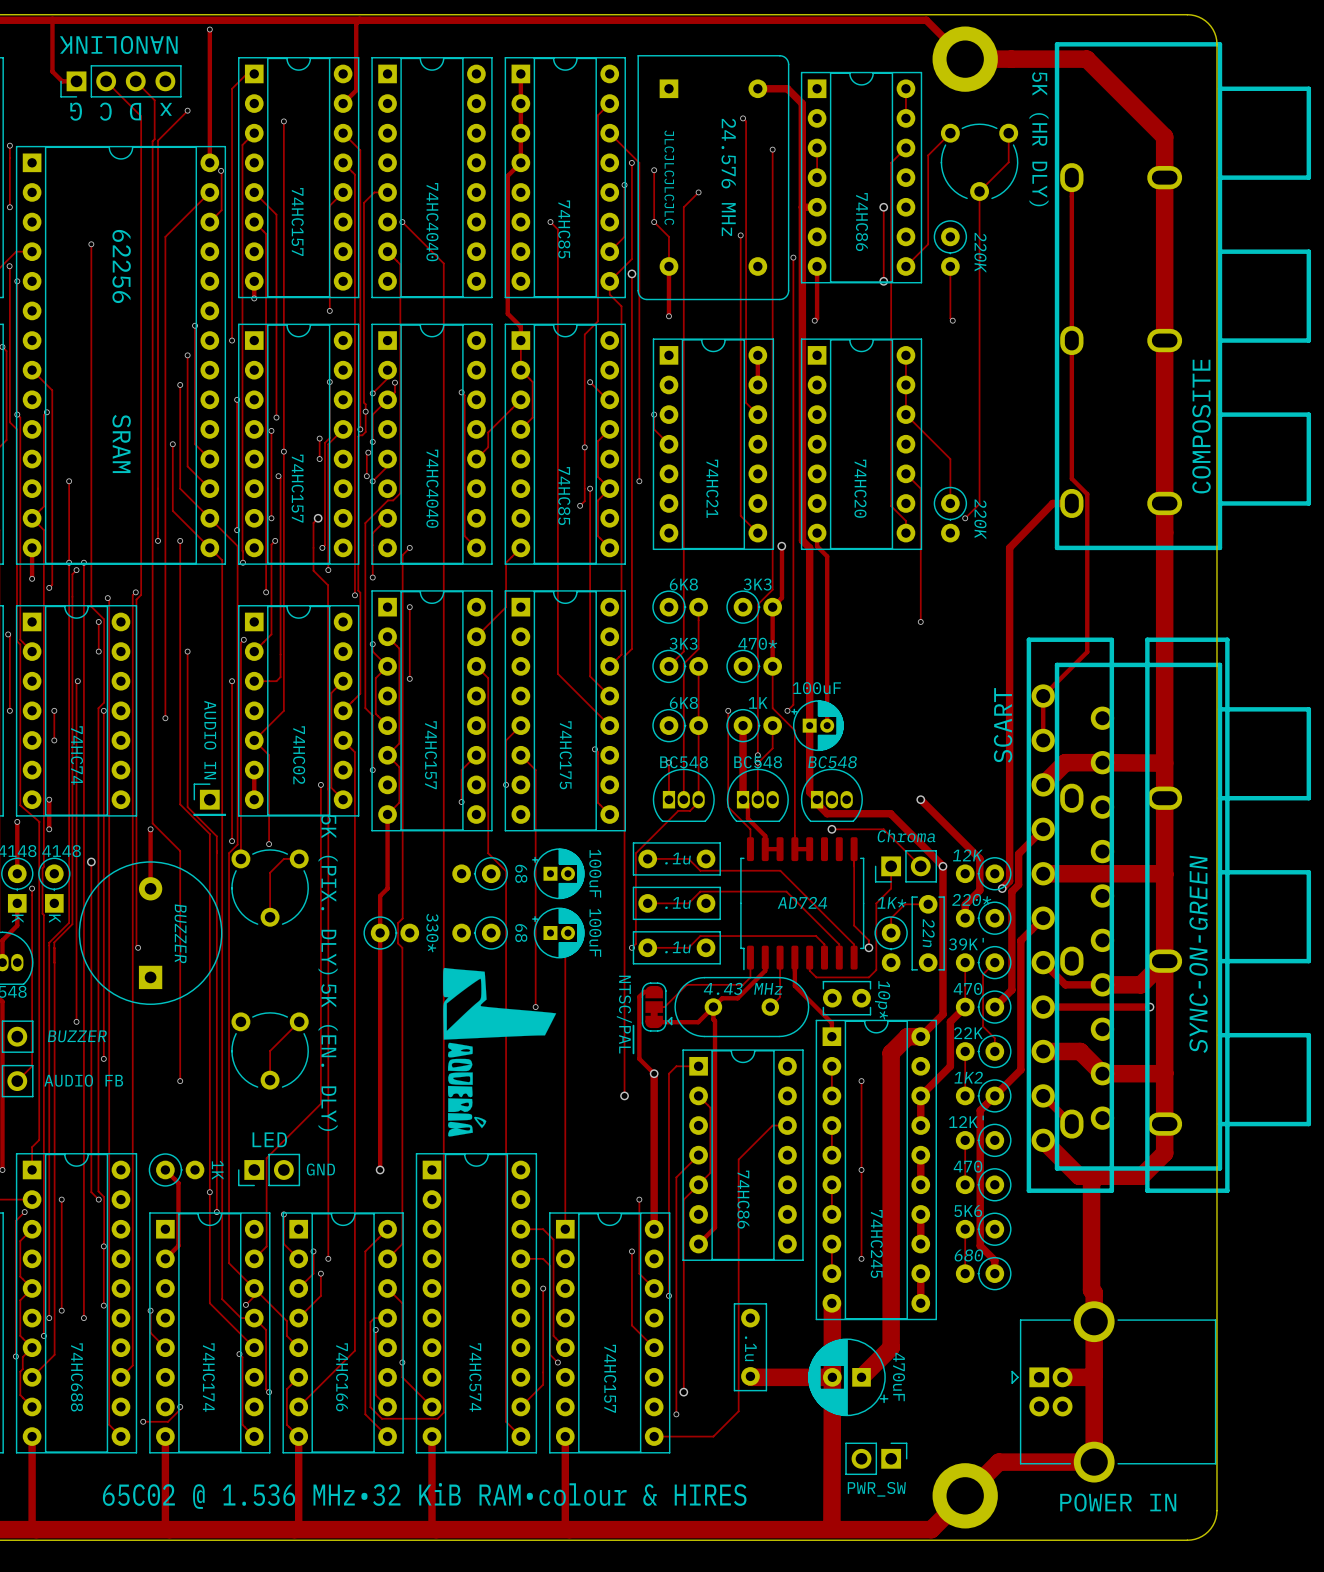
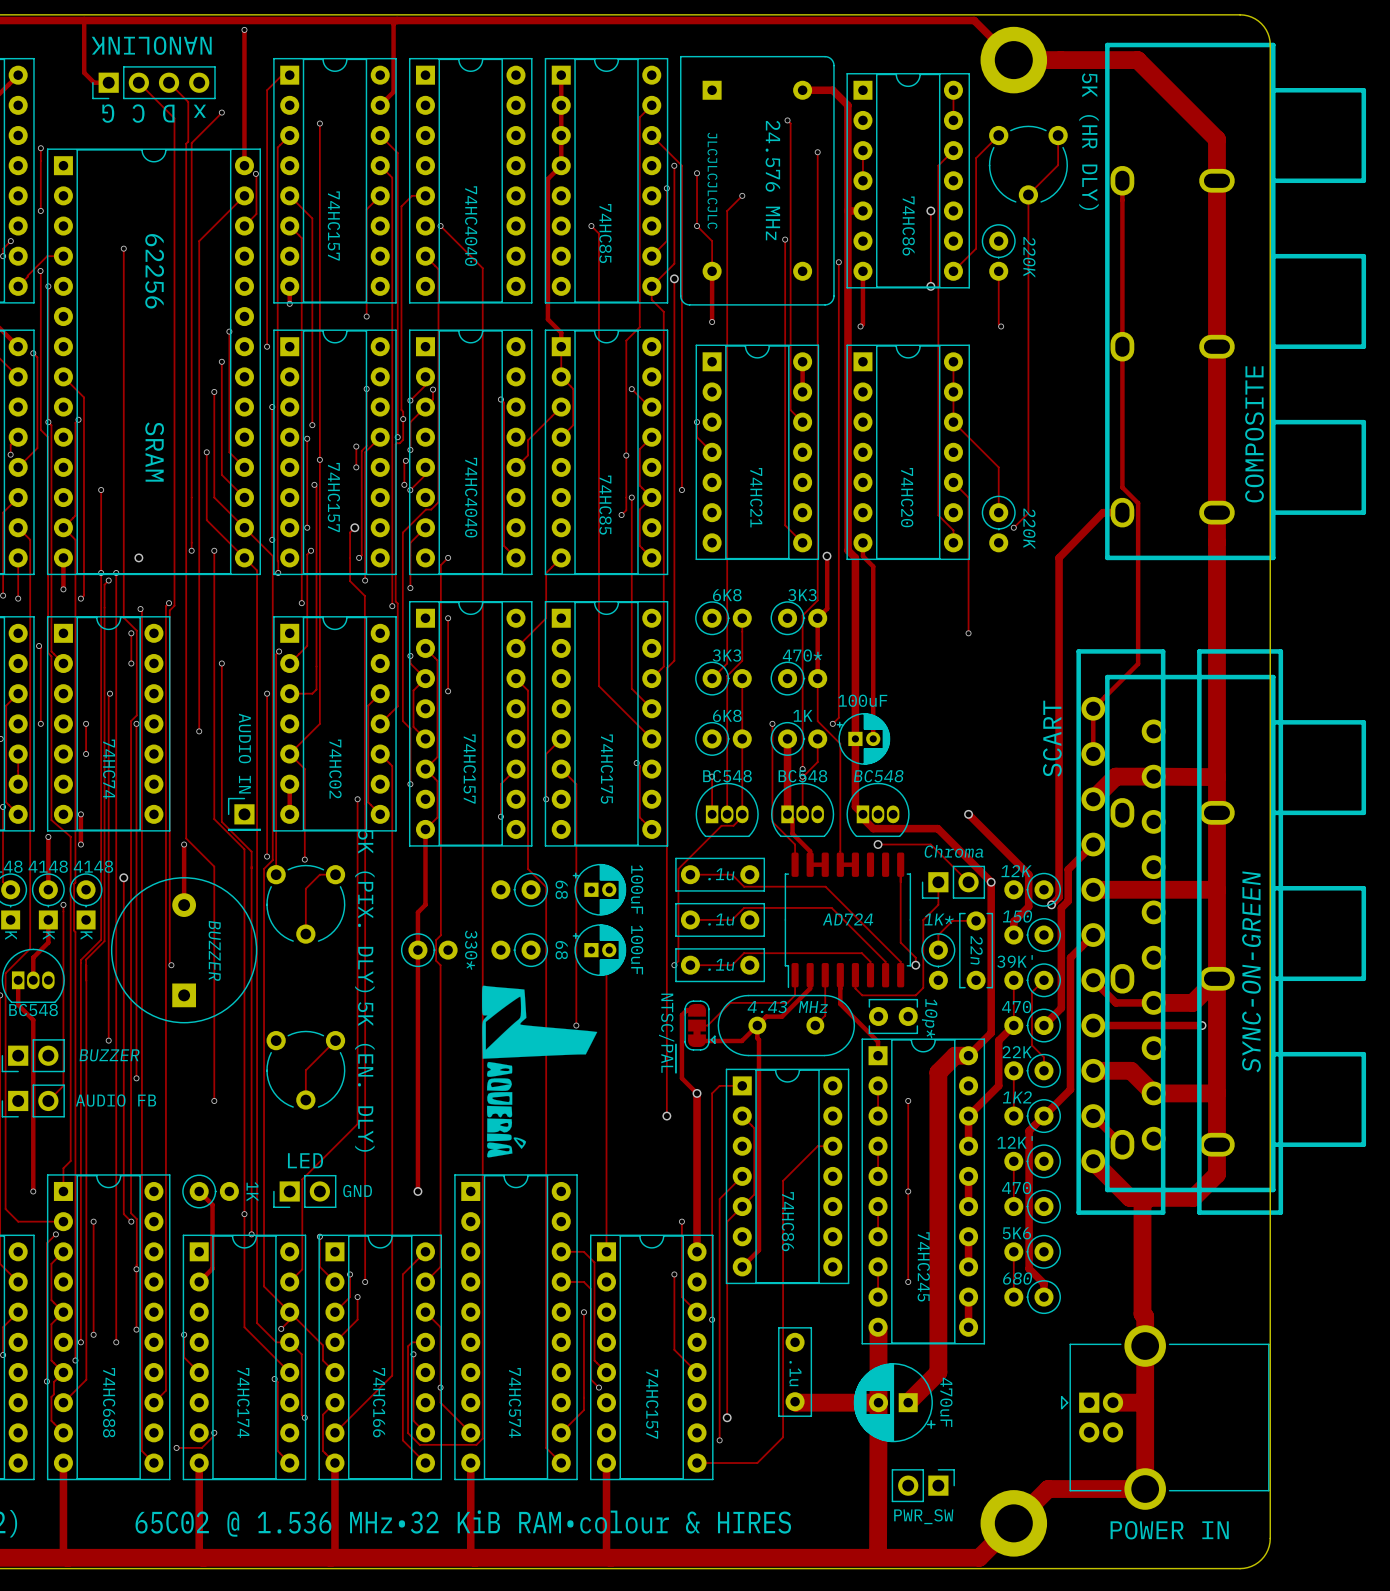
via: none -> (138, 557)
part value: 220* (971, 899) -> 150 (1017, 916)

